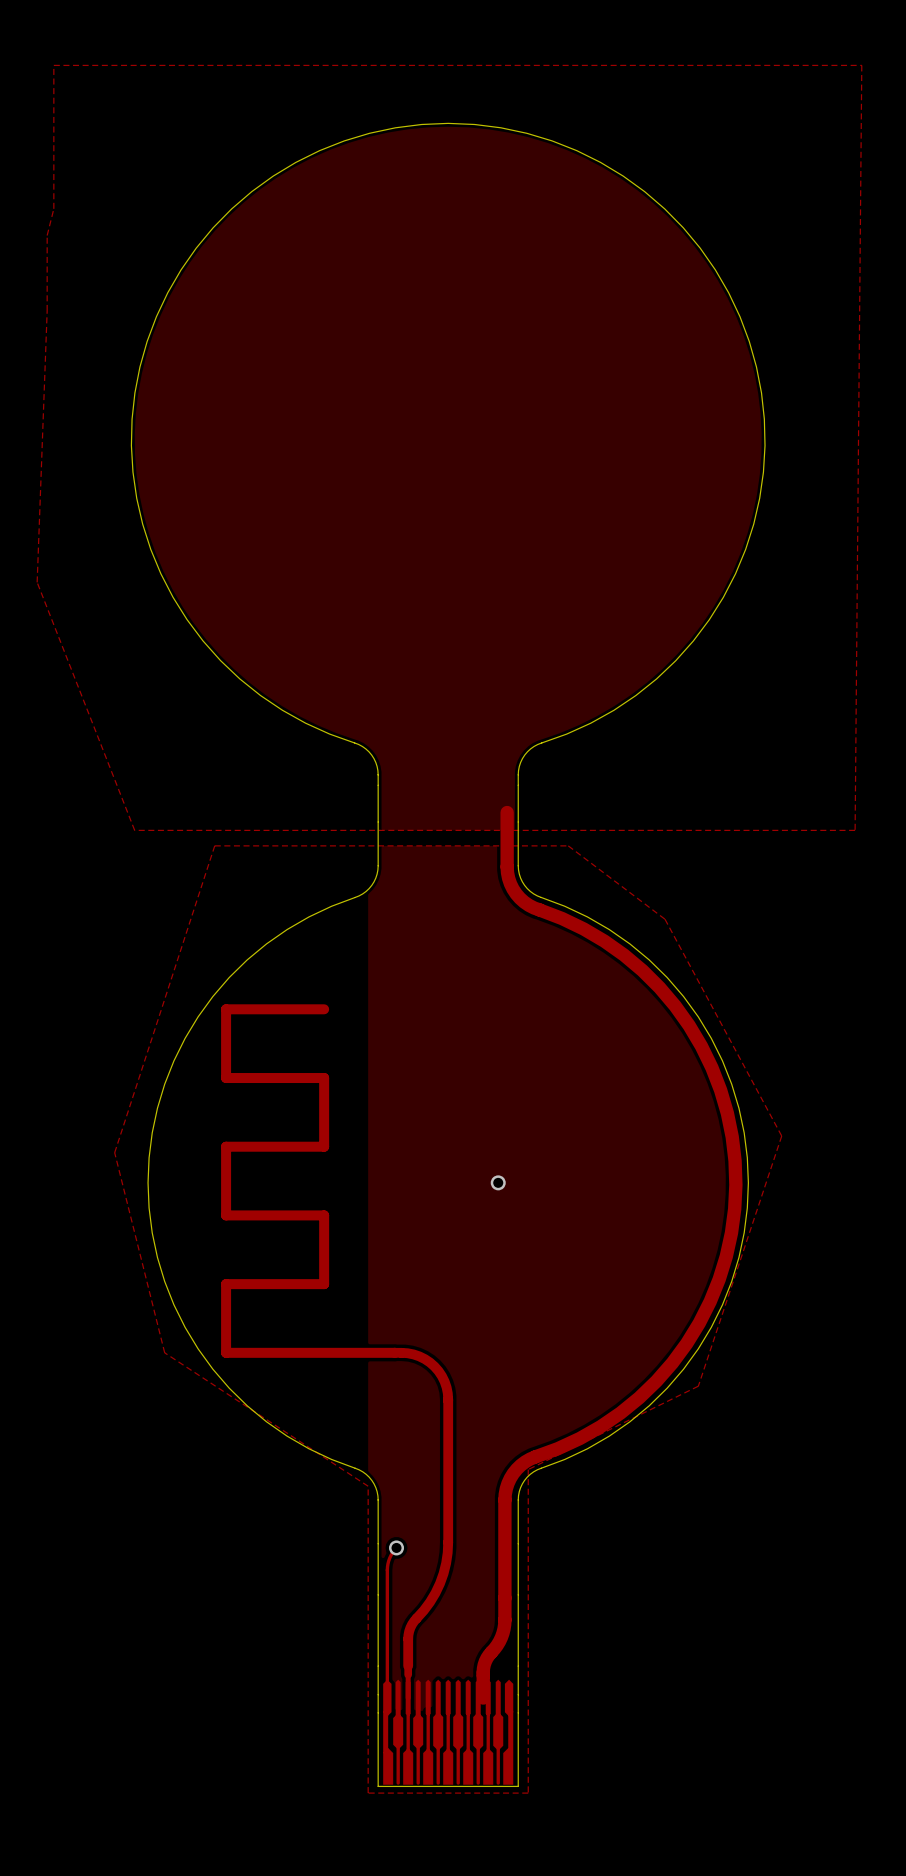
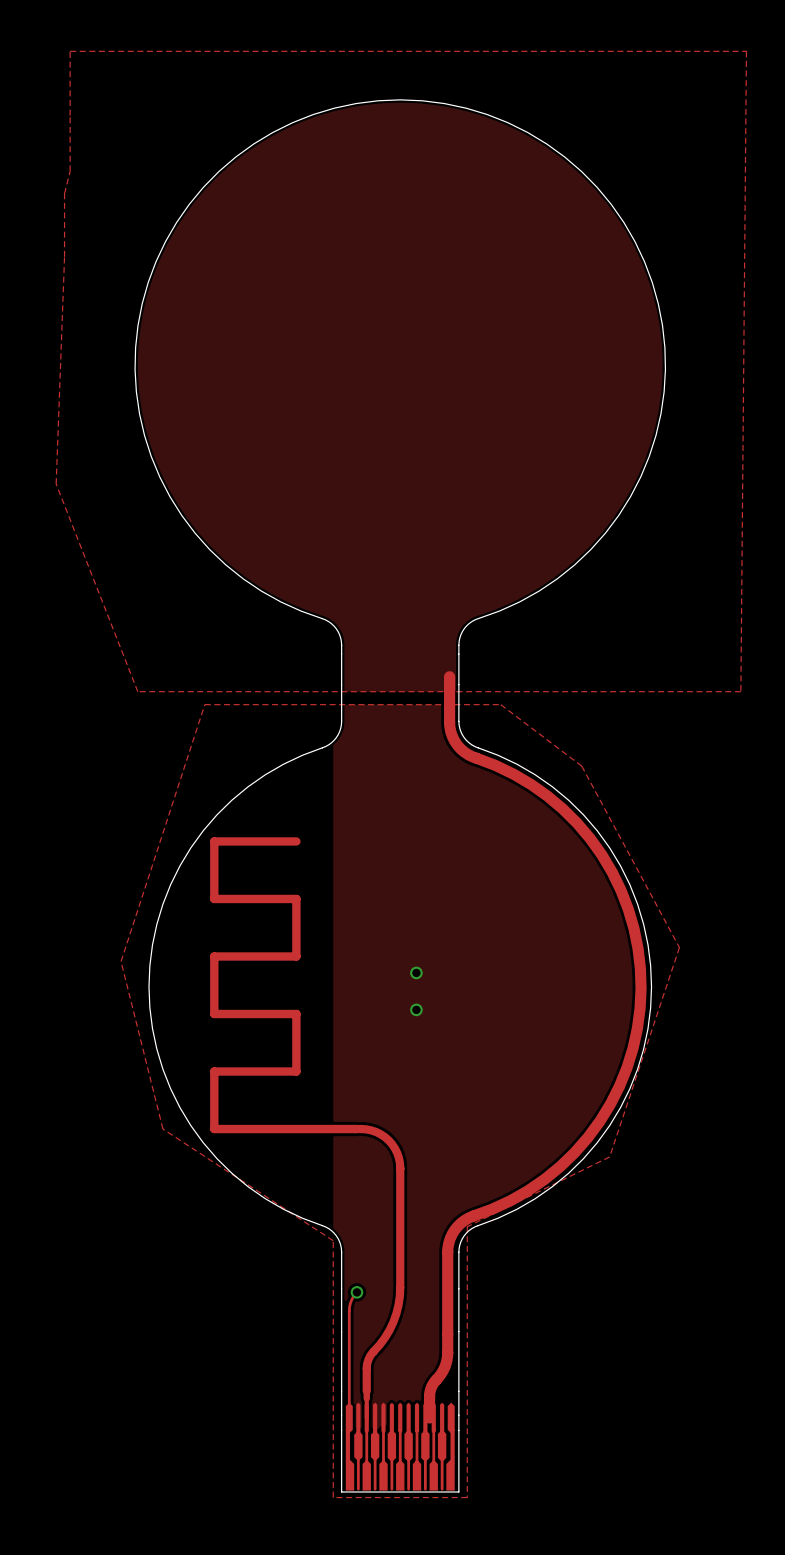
via: none -> (416, 972)
via: (498, 1182) -> none
via: none -> (416, 1009)

